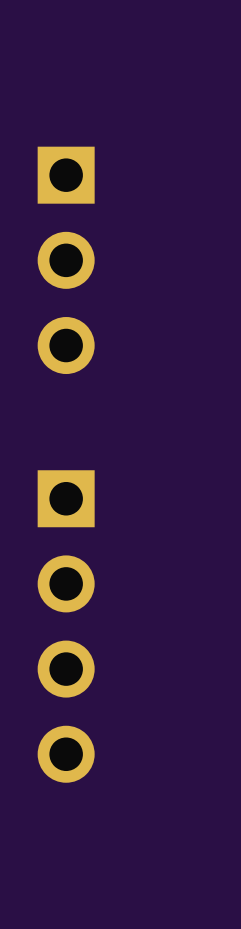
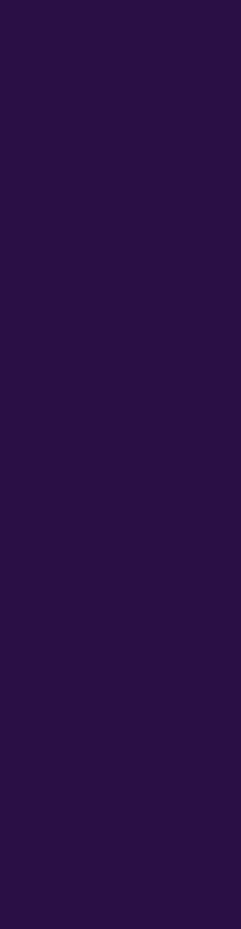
part: (66, 260) -> none
part: (66, 626) -> none

